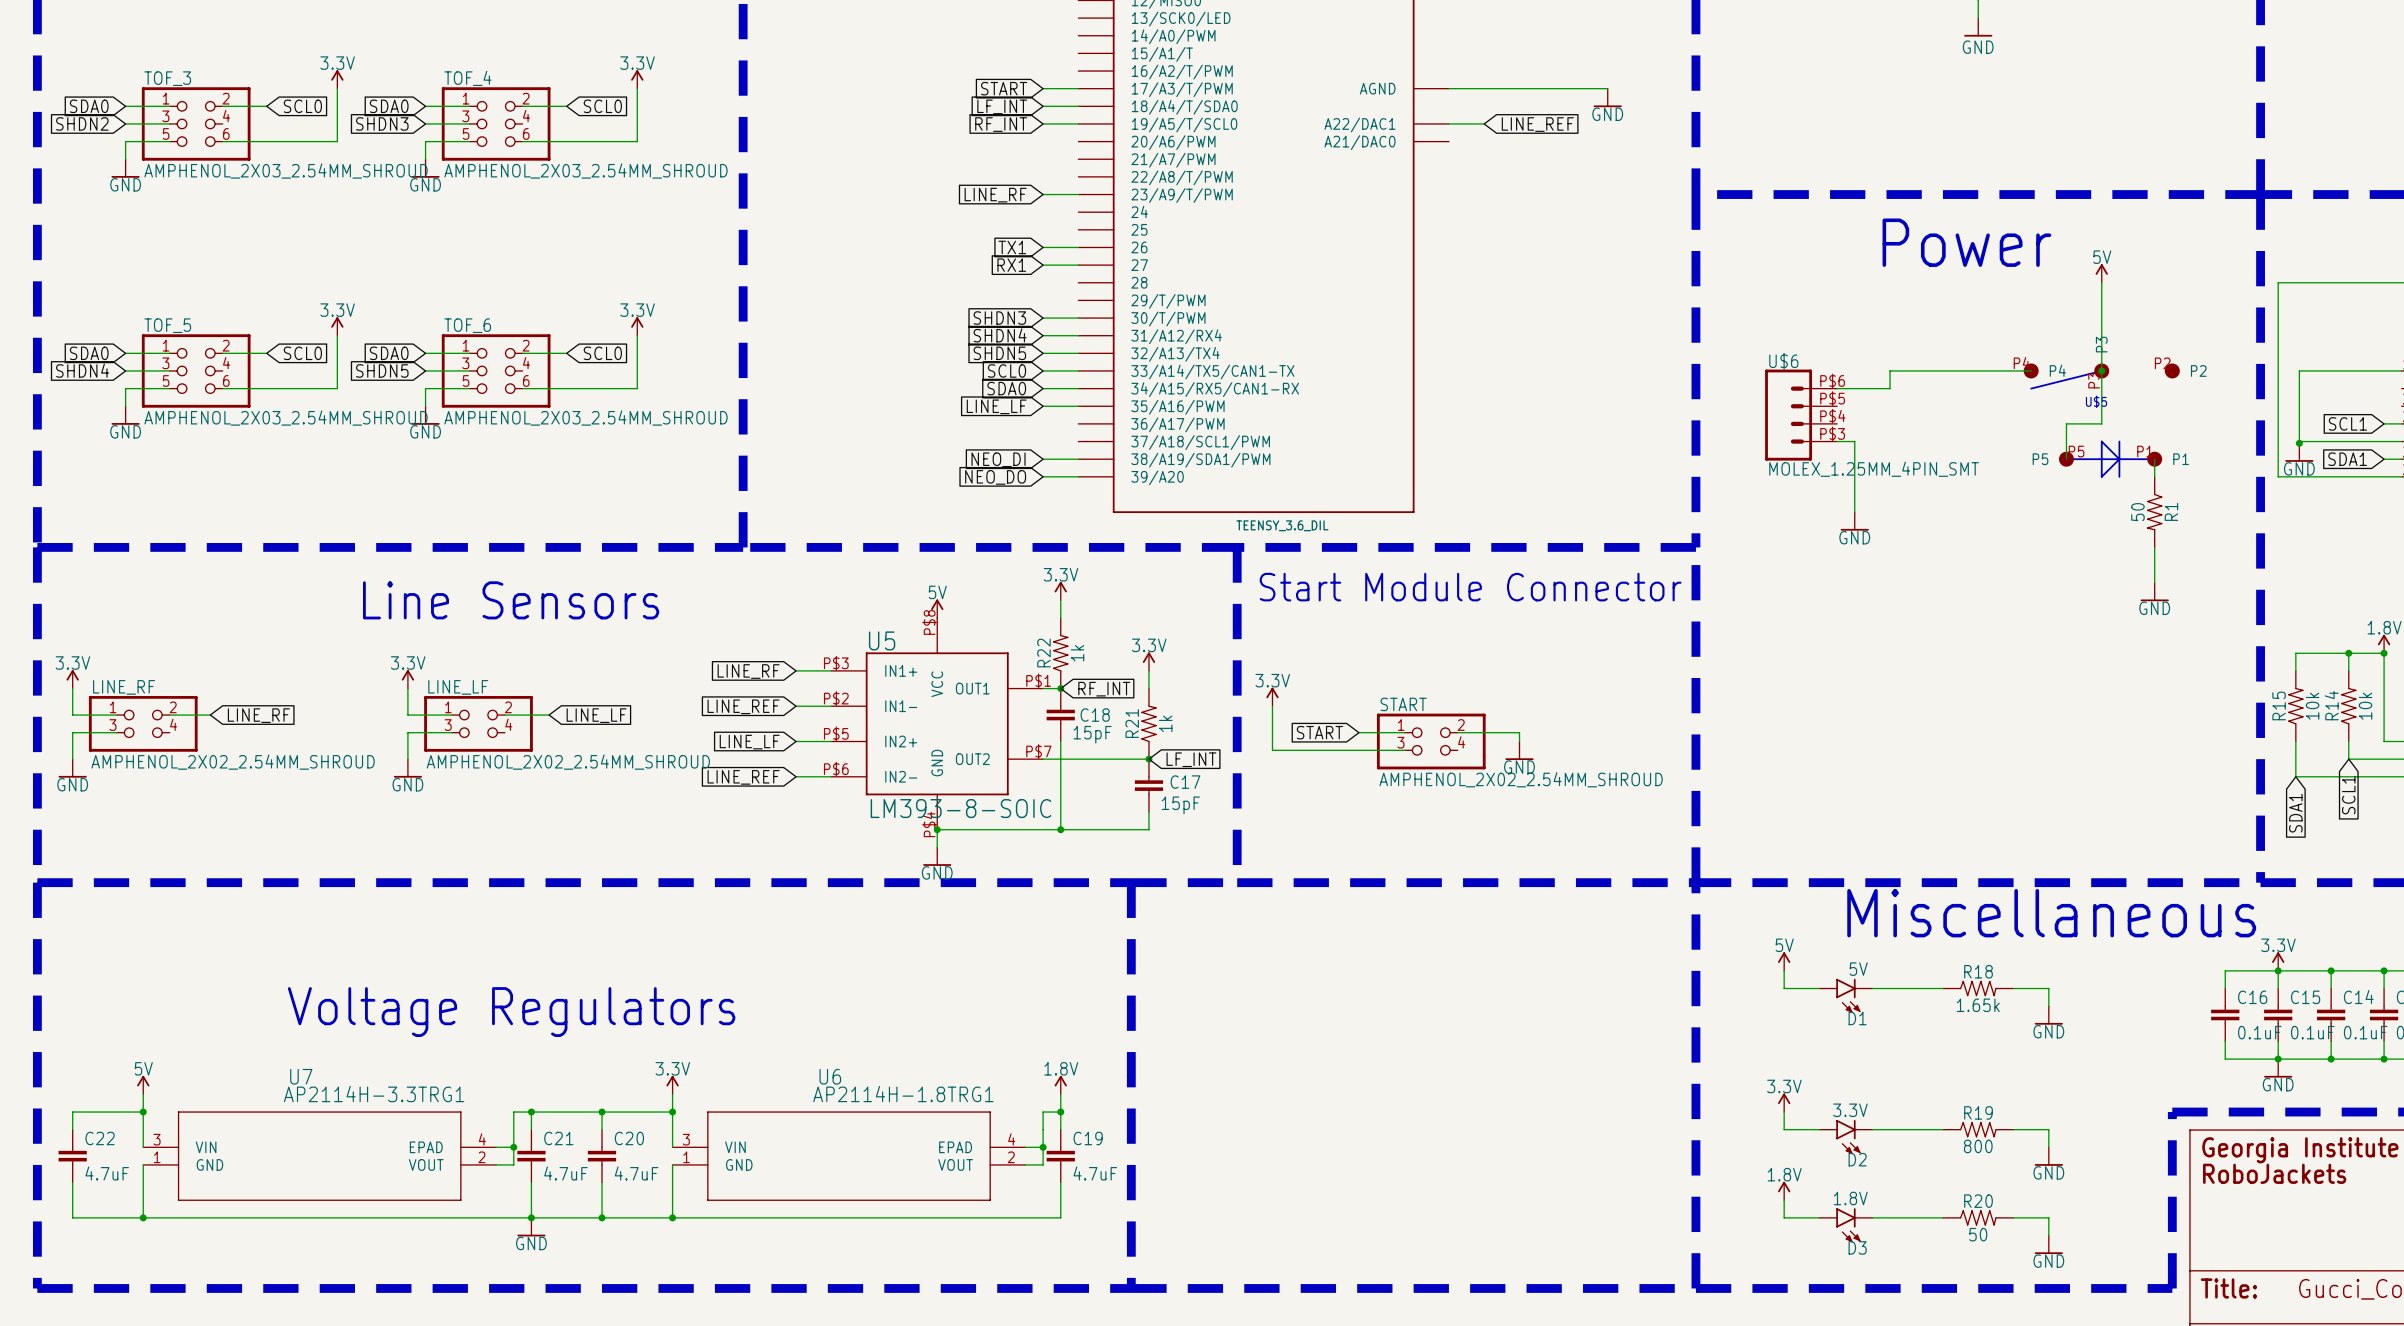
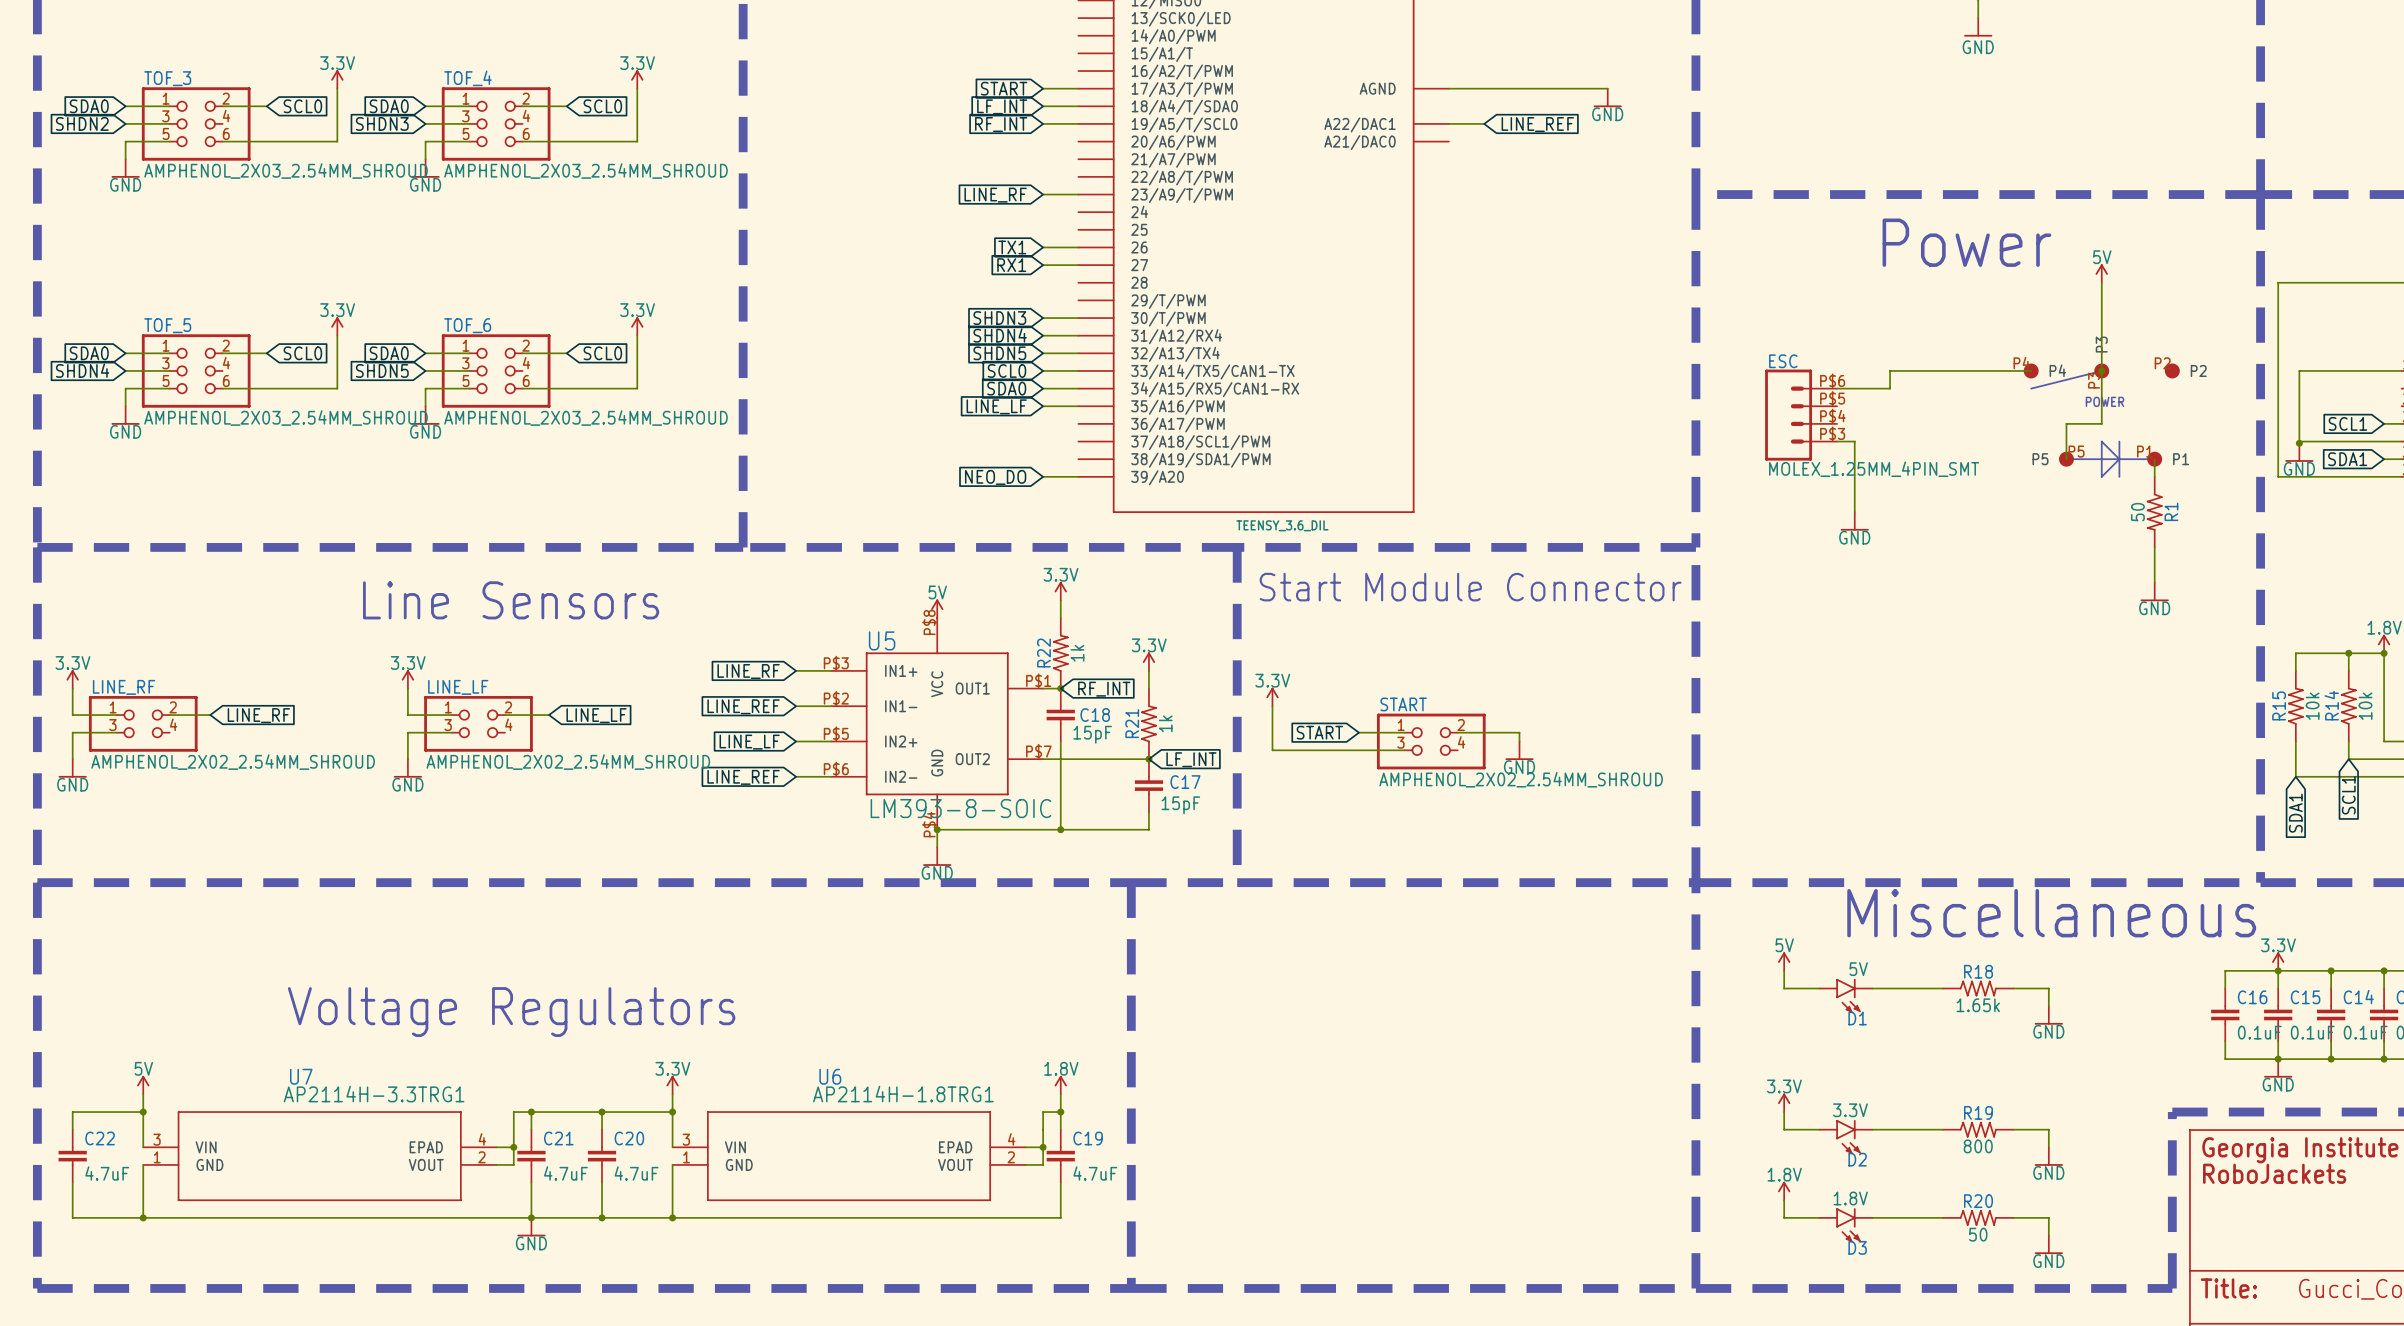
U$6 name: U$6 (1783, 361) -> ESC (1783, 361)
U$5 name: U$5 (2096, 401) -> POWER (2104, 401)
global label: NEO_DI (998, 459) -> none
wire: (1043, 459) (1078, 459) -> none

